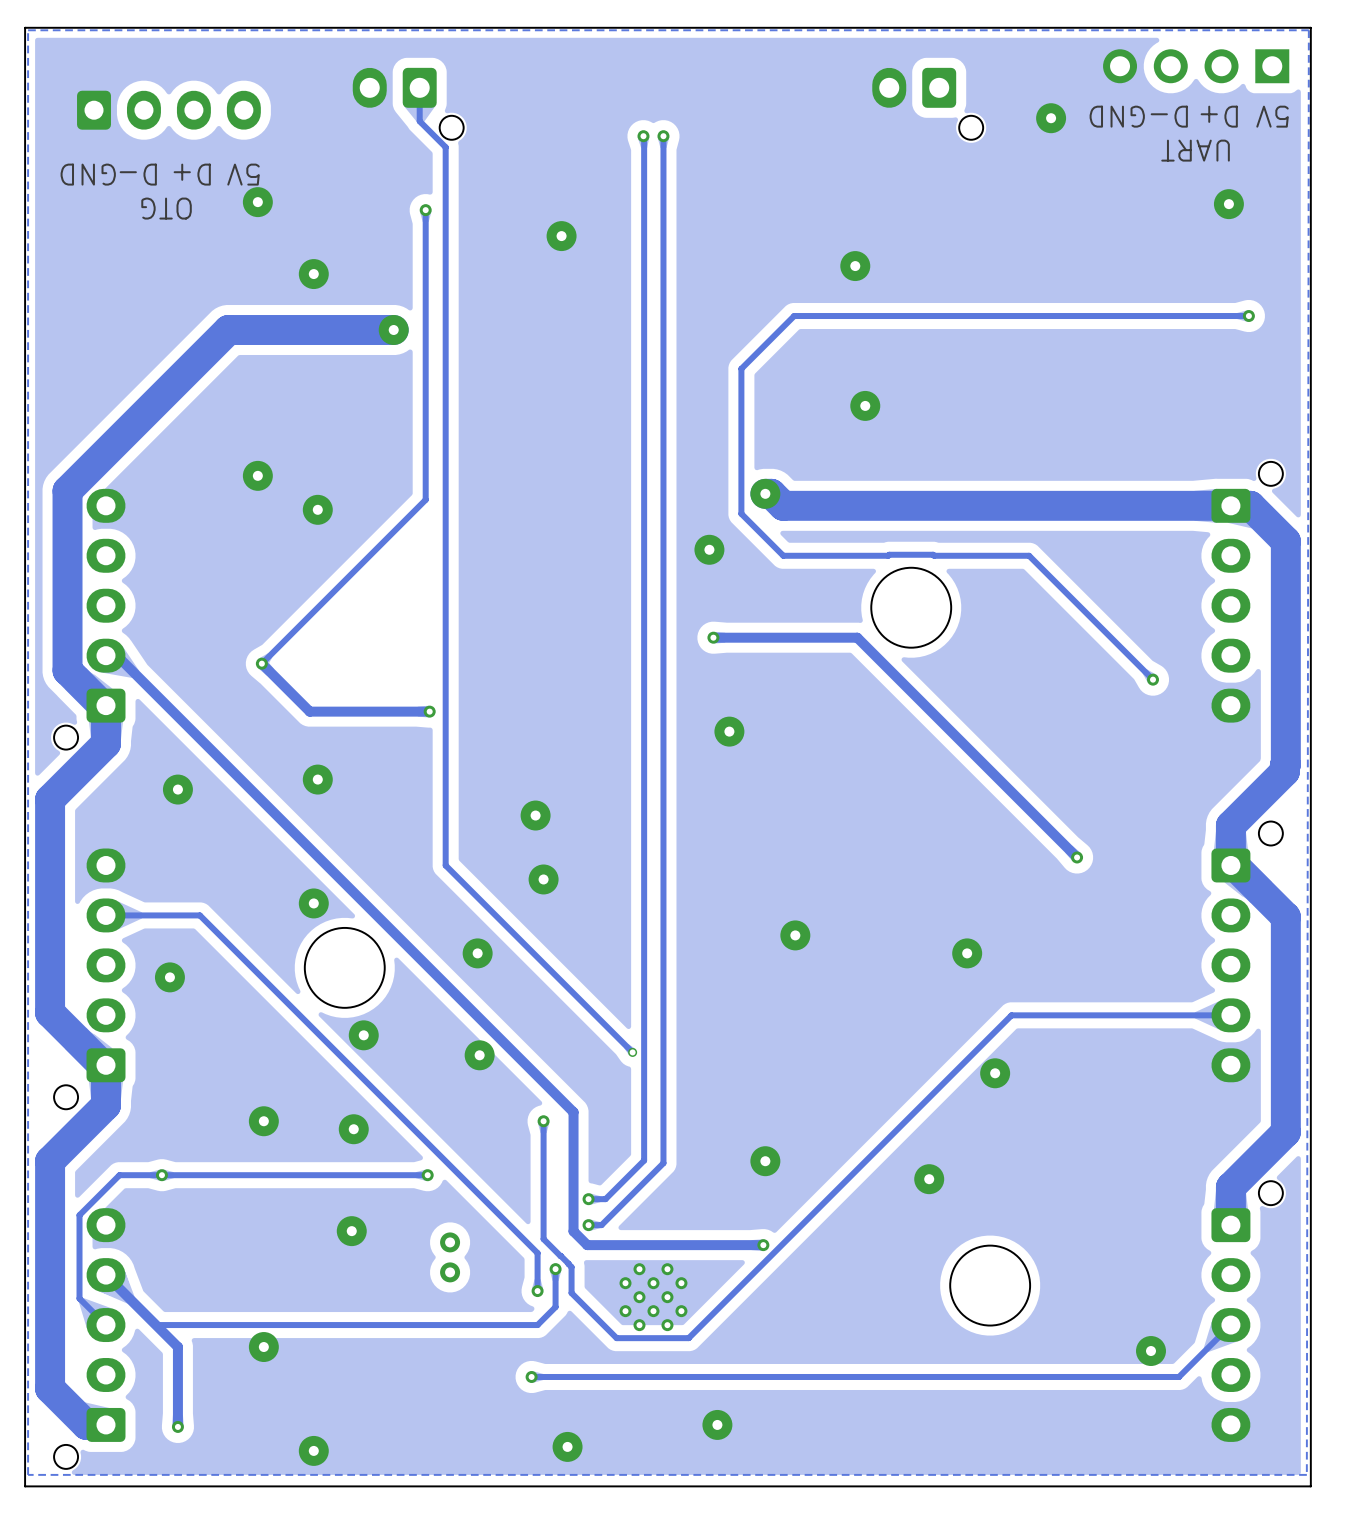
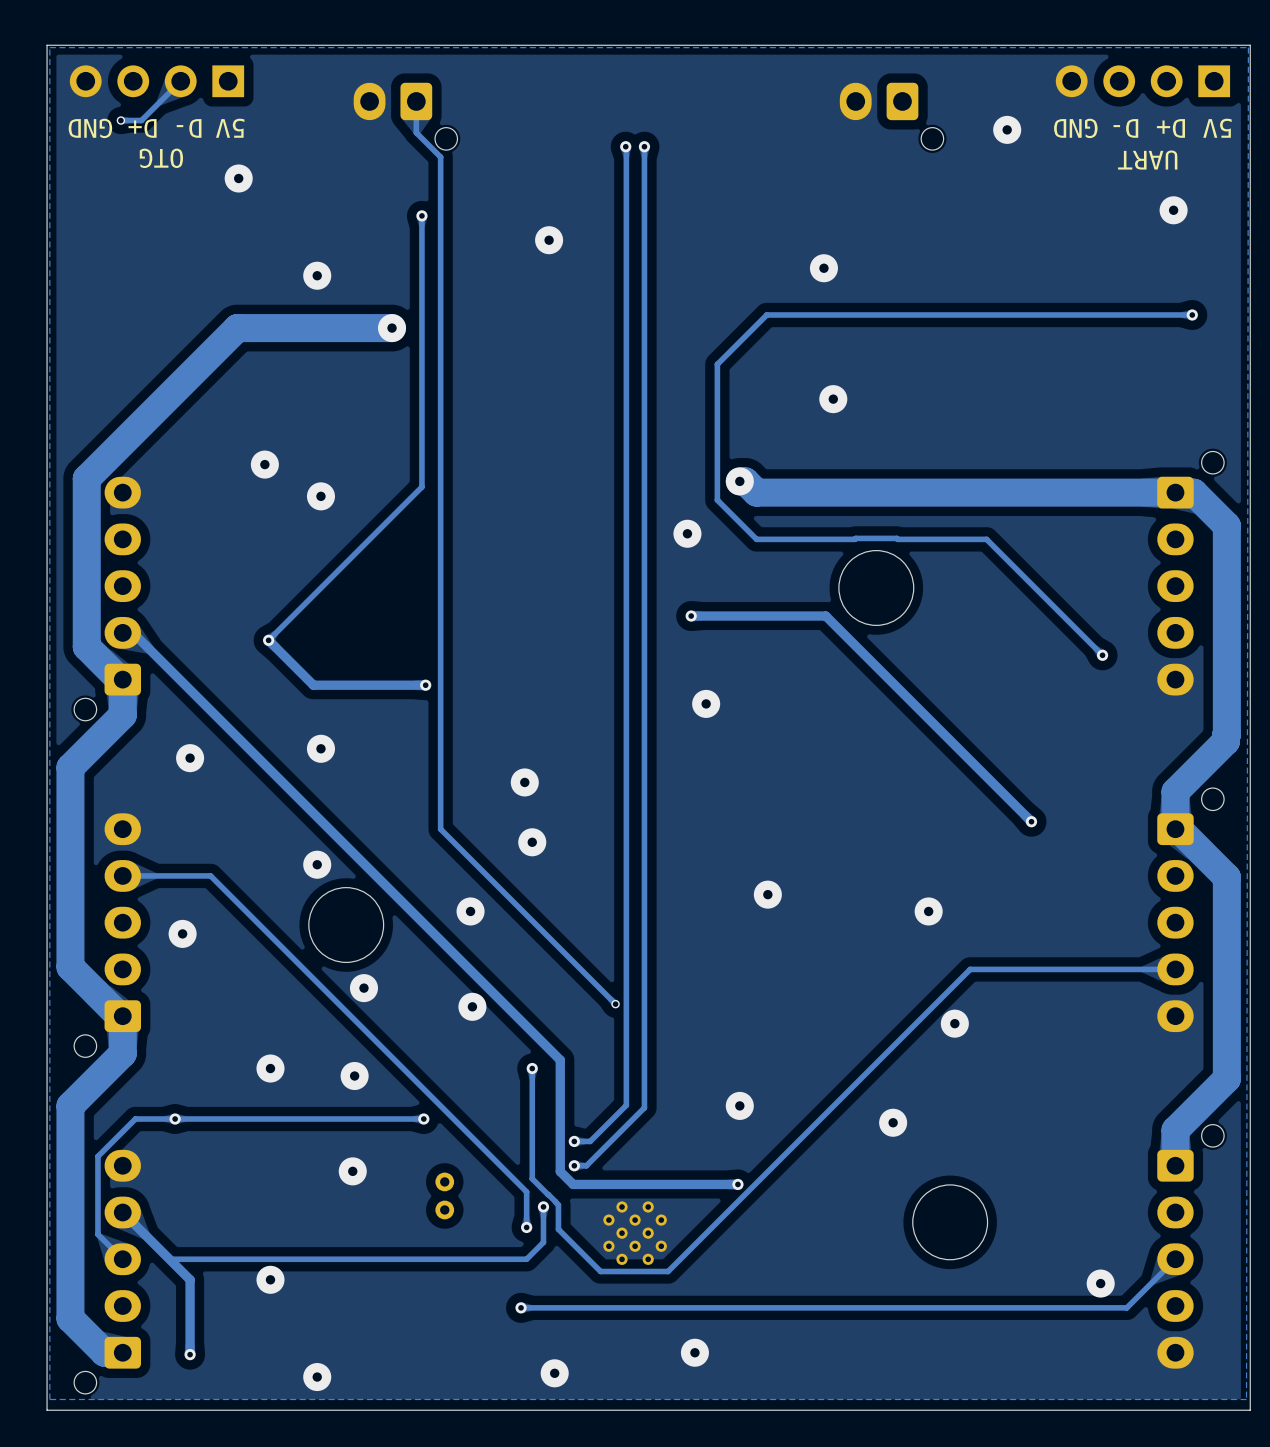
part: none -> (156, 81)
track: none -> (180, 81) (141, 120) (120, 120)
via: none -> (120, 120)
part: (168, 110) -> none
text position: GND (88, 174) -> GND (90, 128)
text position: D- (138, 174) -> D- (189, 128)
text position: D+ (192, 174) -> D+ (142, 128)
text position: 5V (243, 174) -> 5V (230, 128)
via position: (257, 202) -> (238, 178)
text position: OTG (166, 208) -> OTG (161, 158)

